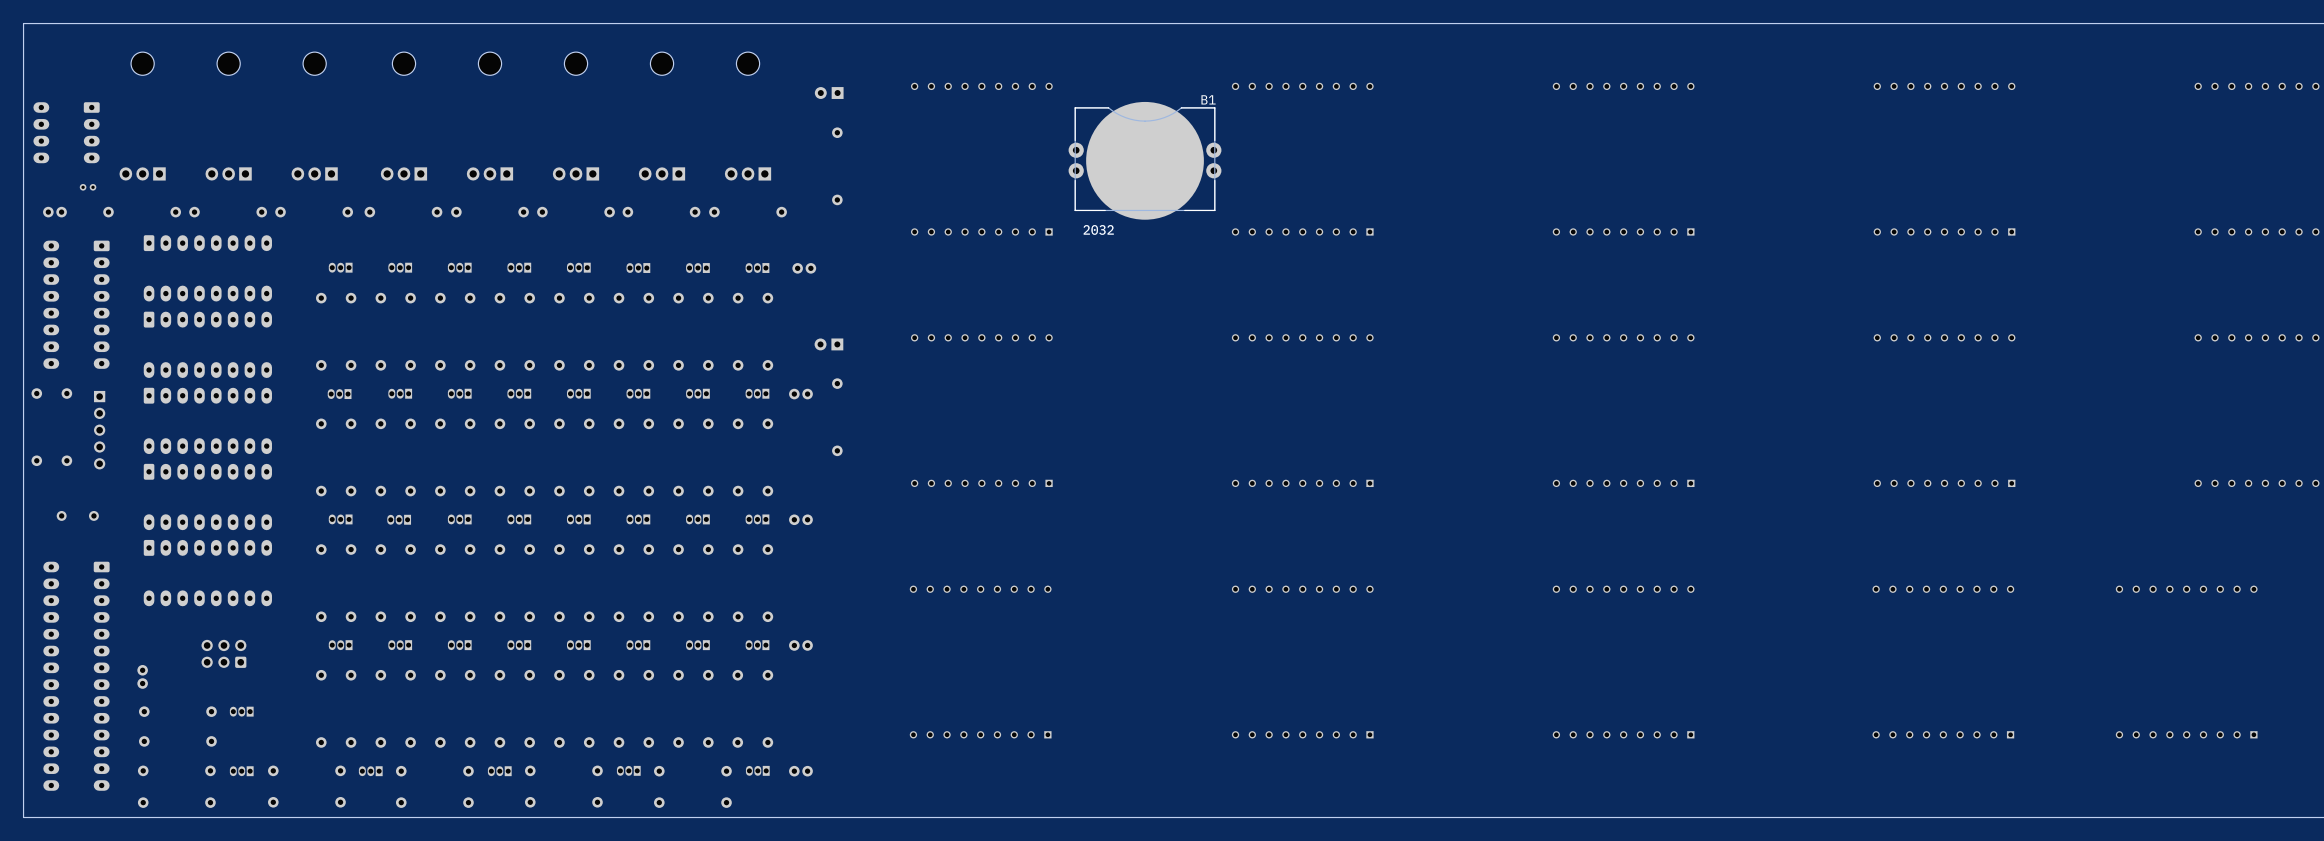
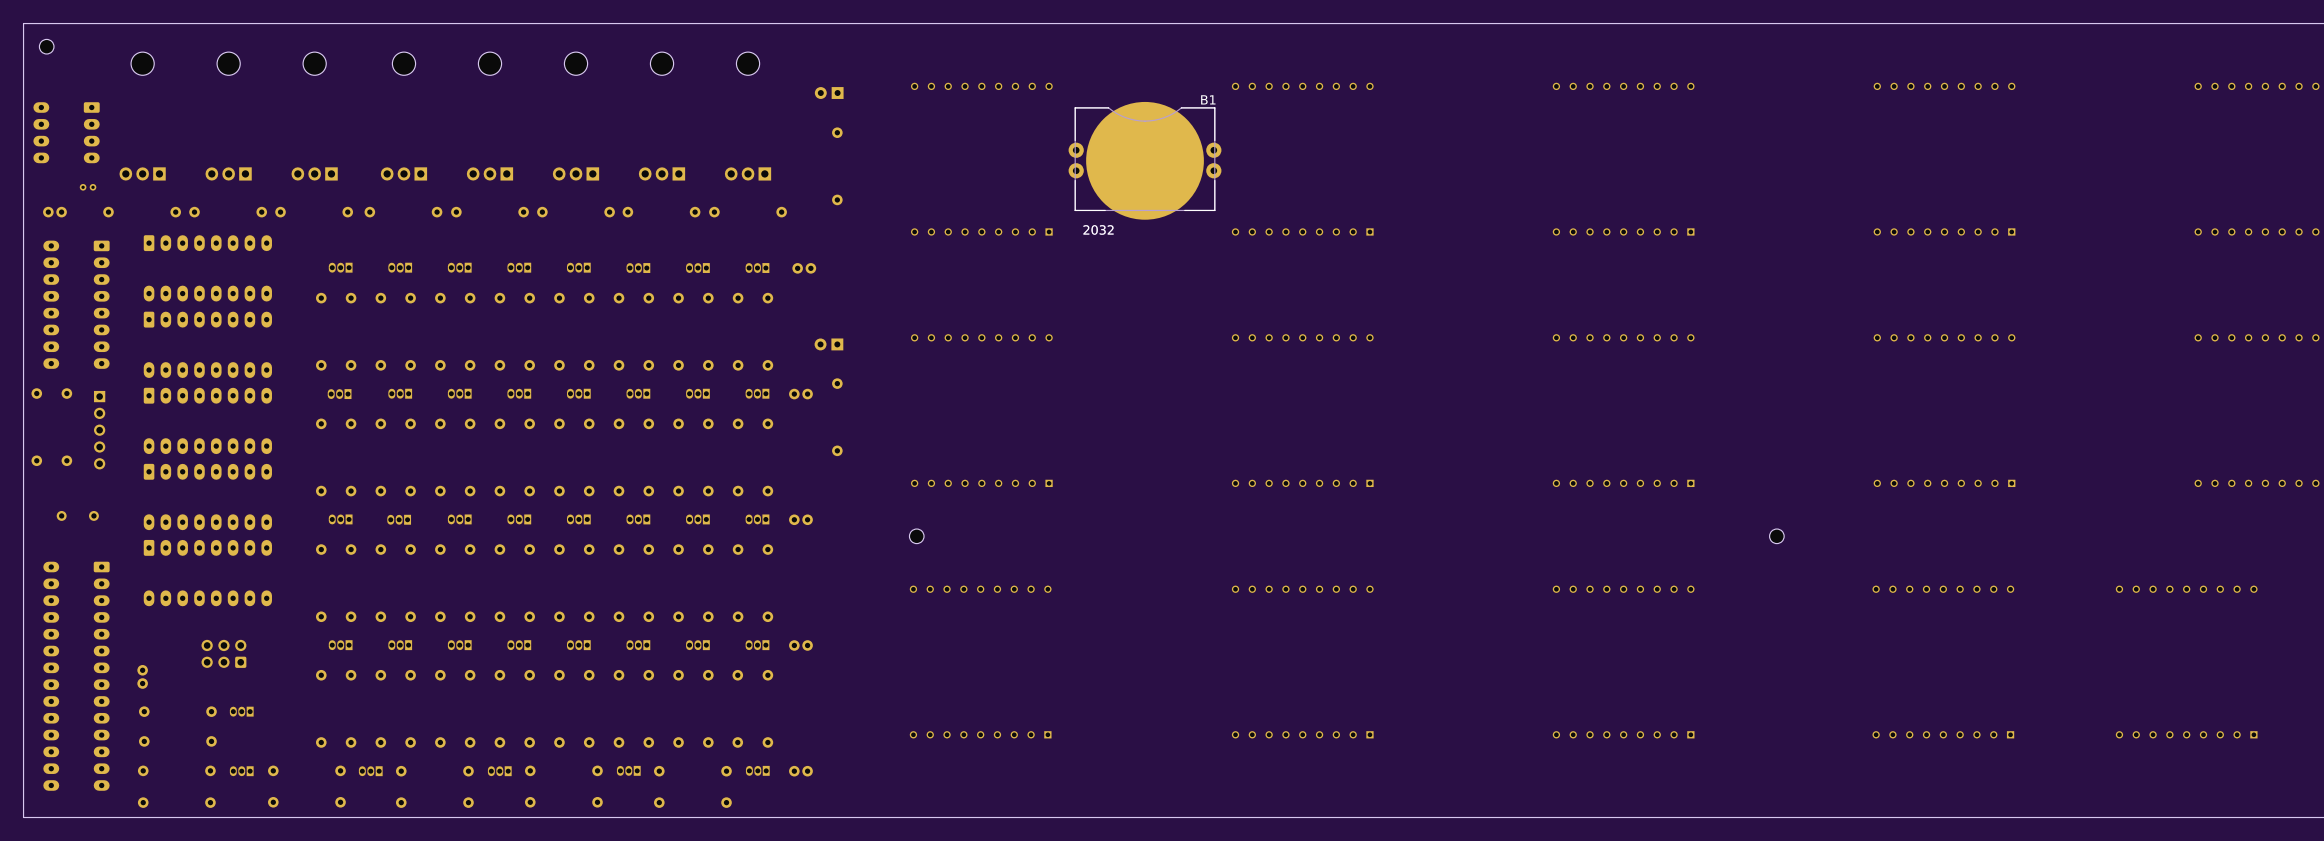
part: none -> (46, 46)
part: none -> (916, 536)
part: none -> (1776, 536)

